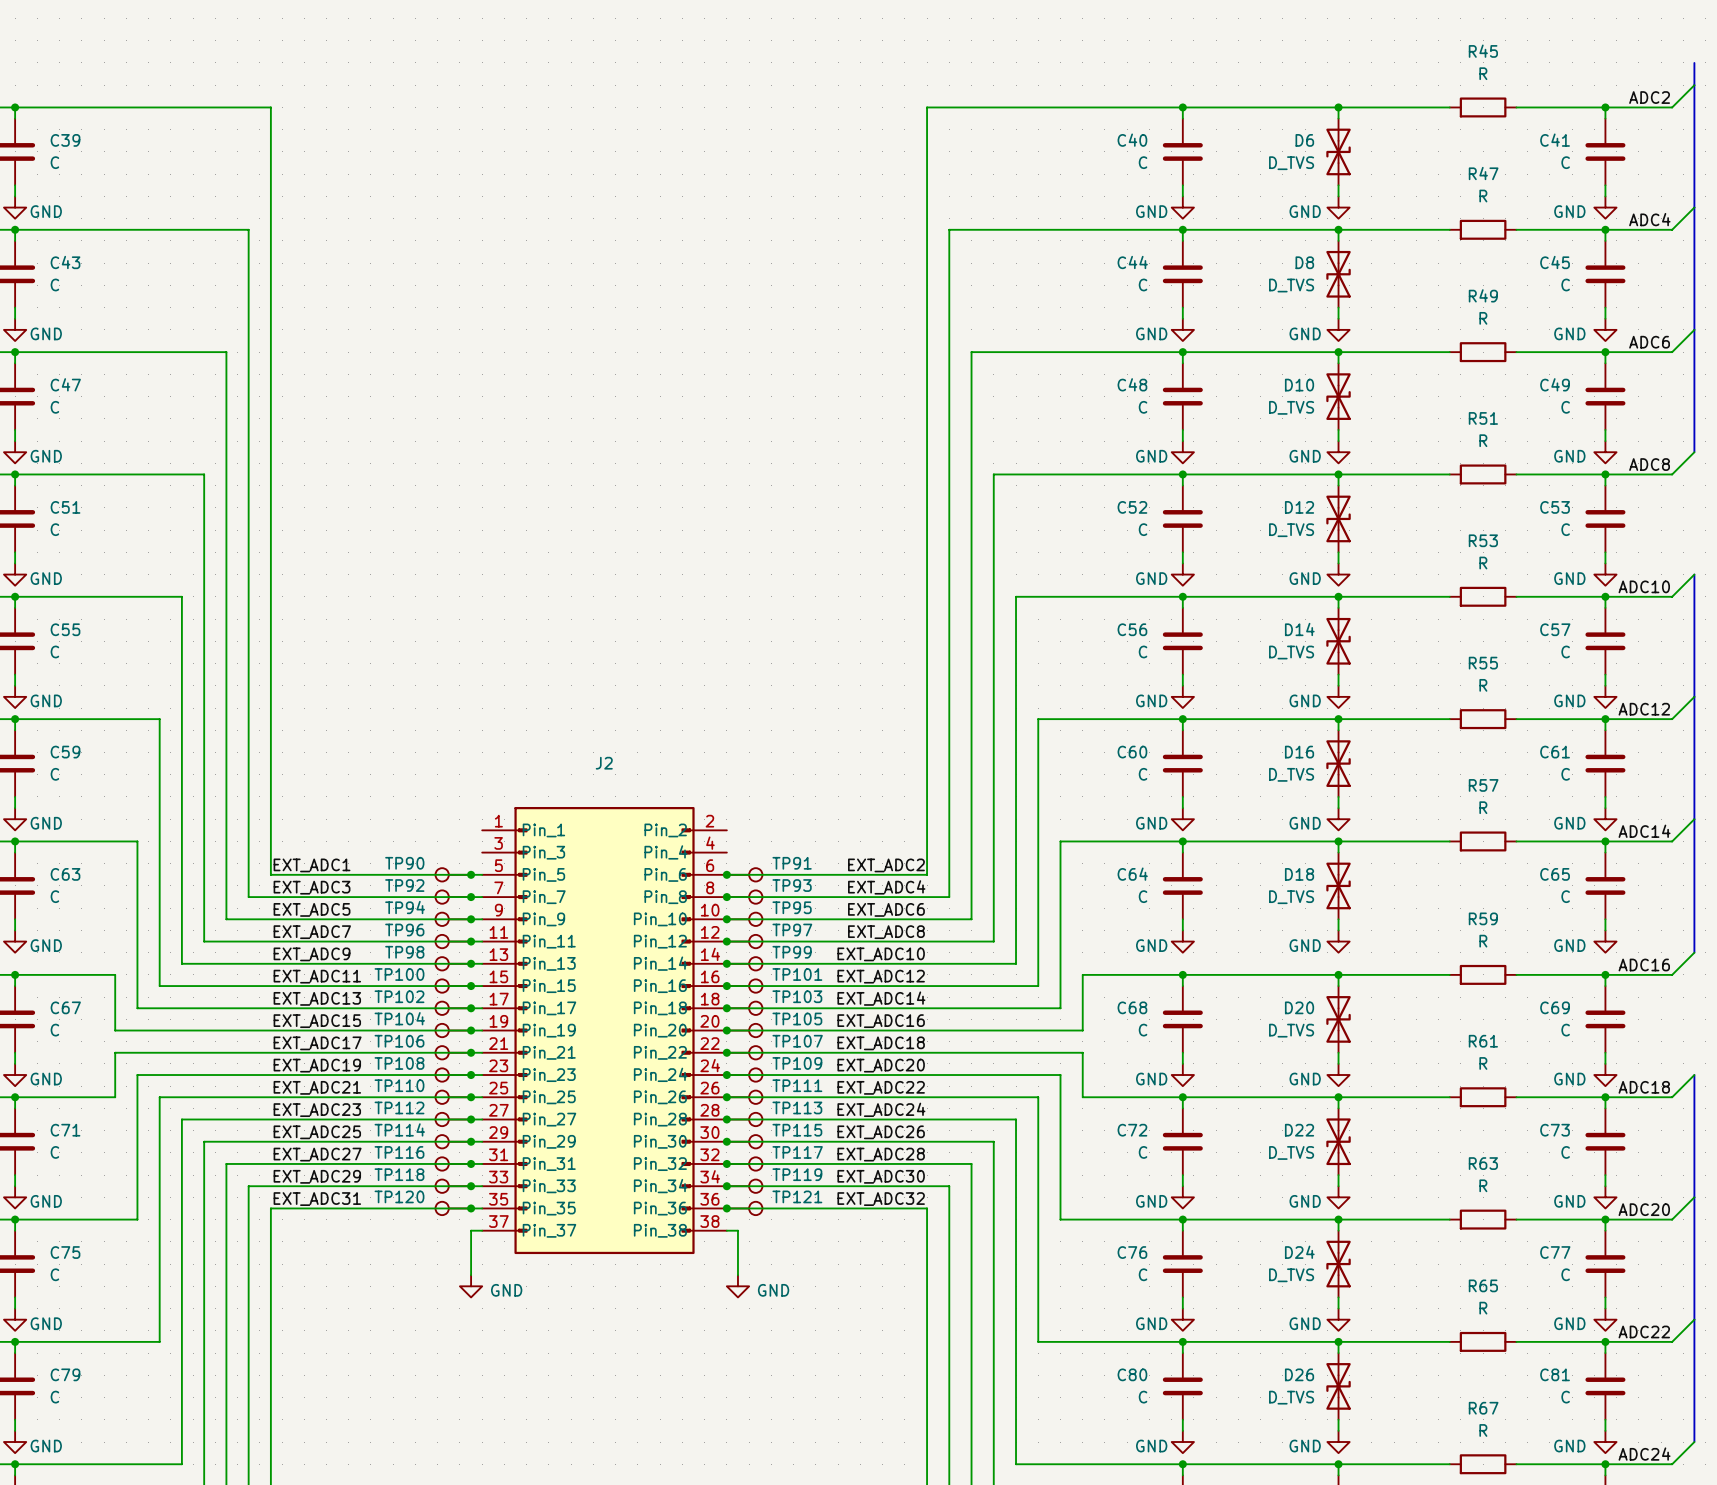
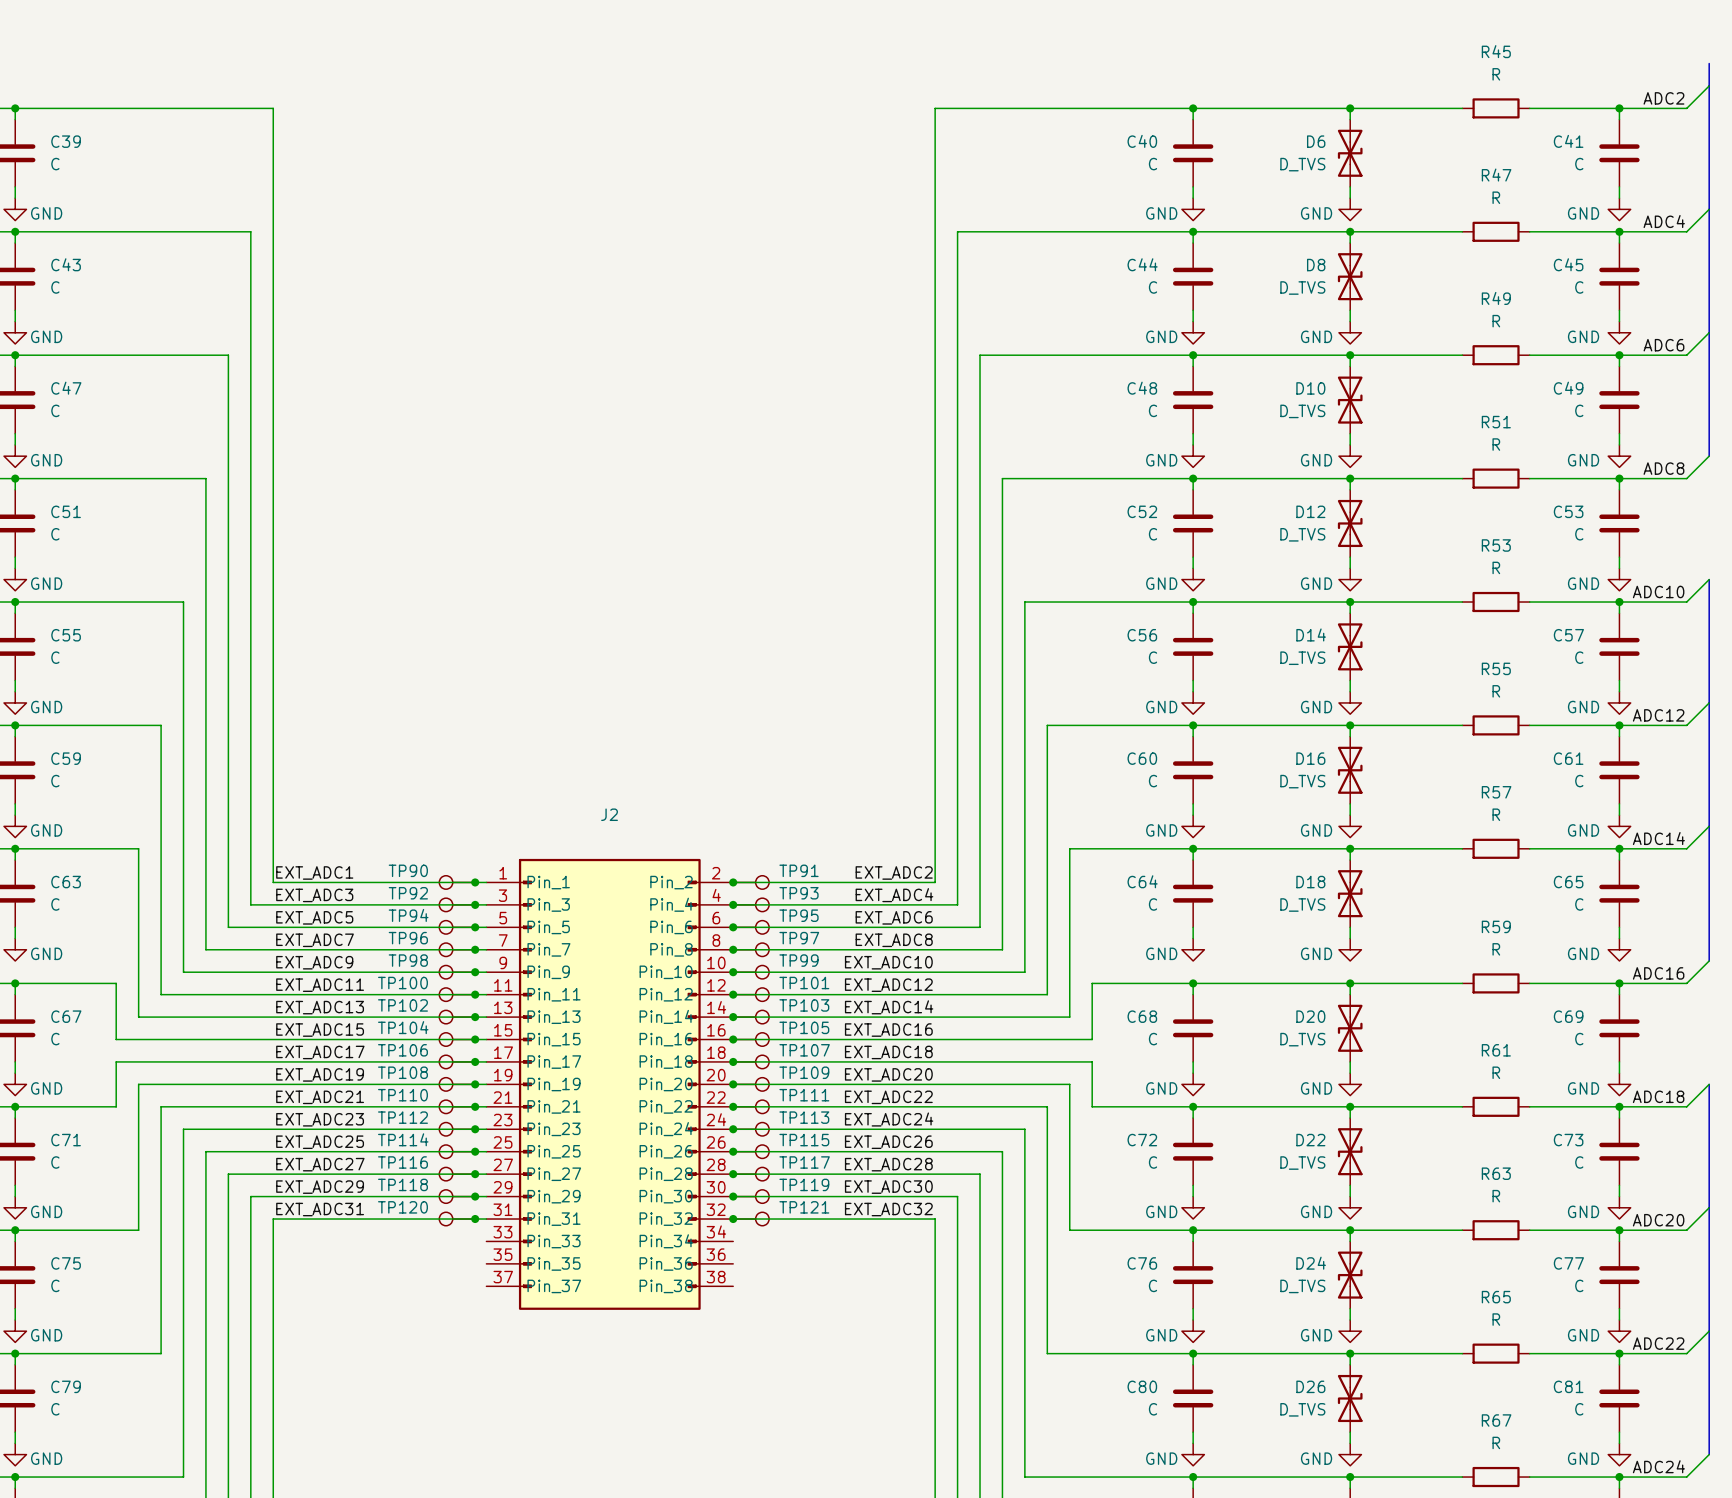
J2 position: (604, 1030) -> (609, 1084)
wire: (482, 1230) (471, 1230) (471, 1275) -> none
wire: (726, 1230) (737, 1230) (737, 1275) -> none
power symbol: GND (471, 1286) -> none
power symbol: GND (737, 1286) -> none

